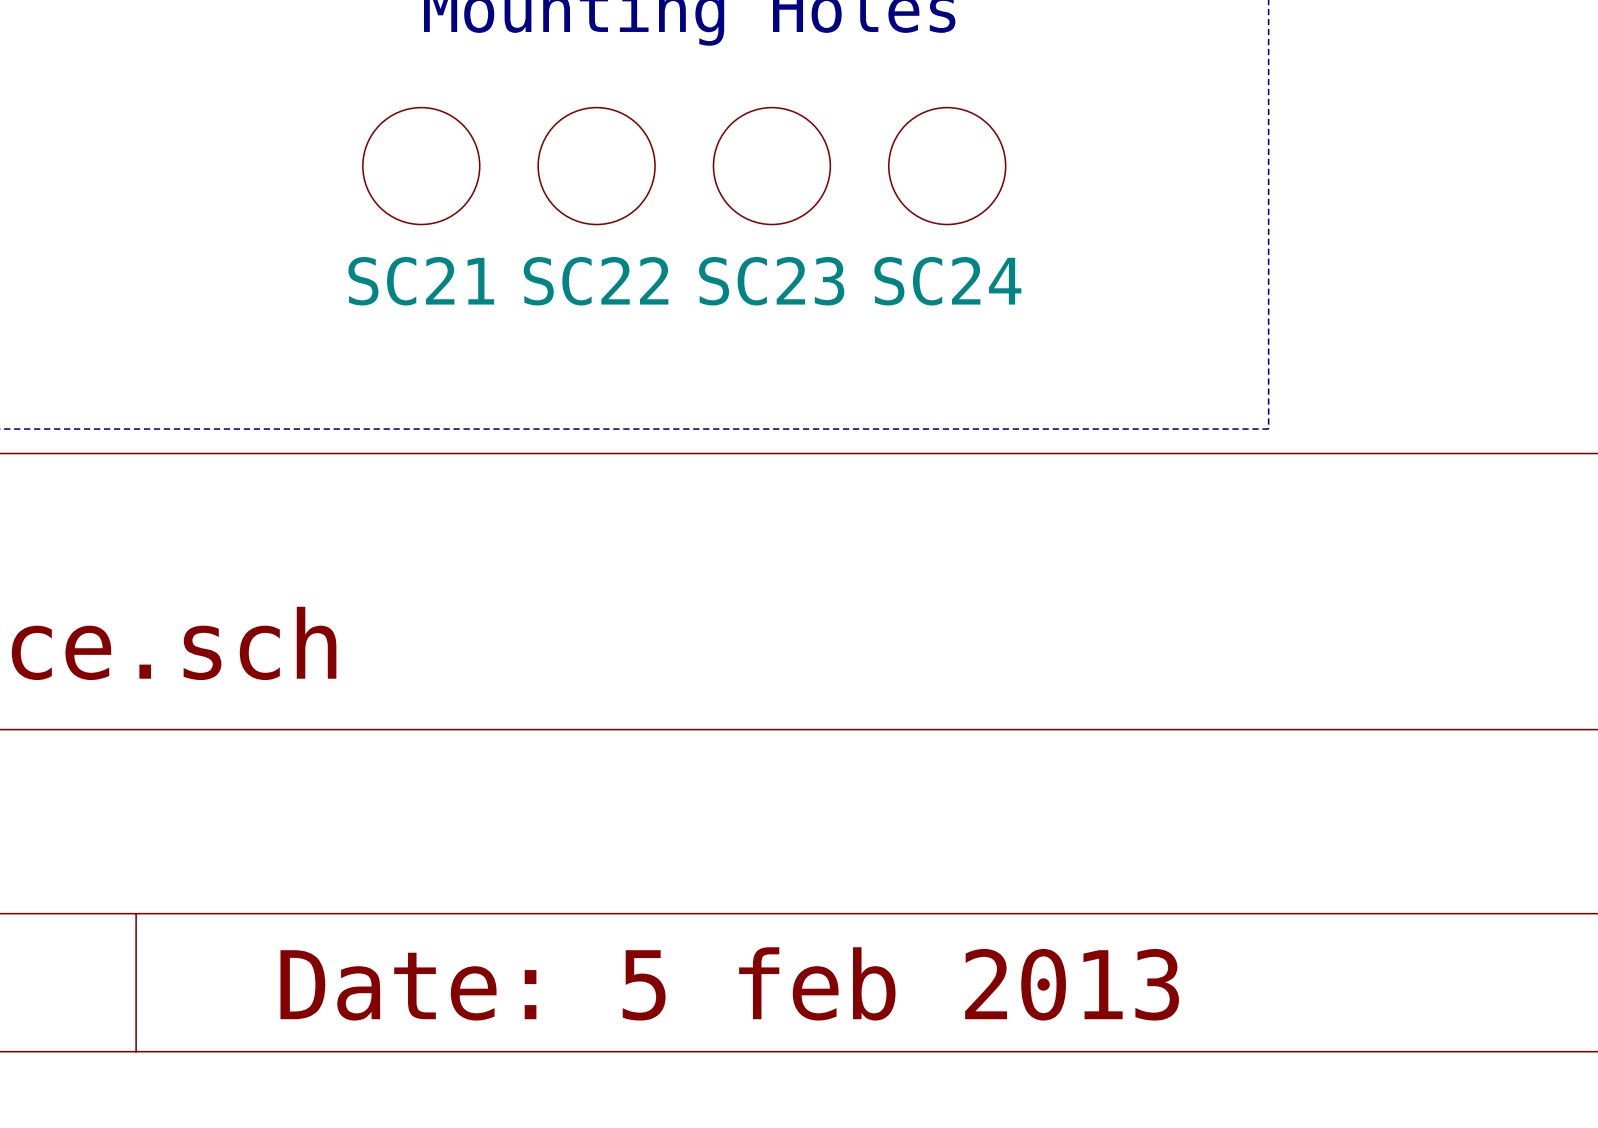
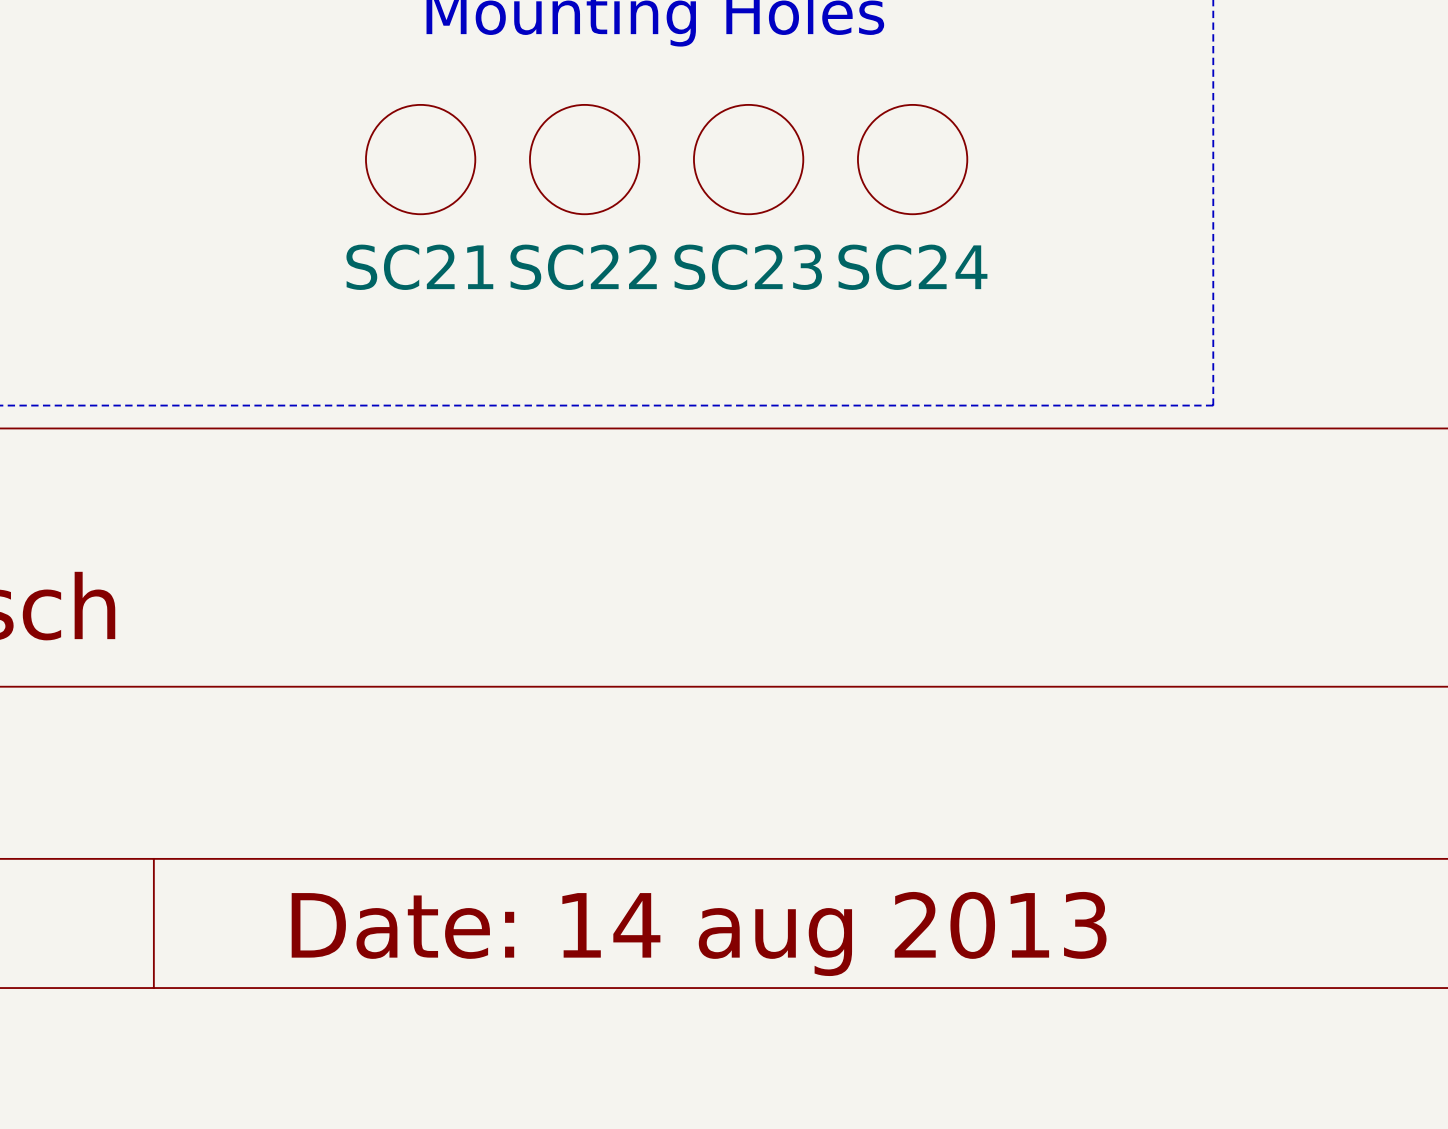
title block: Date: 5 feb 2013 (729, 983) -> Date: 14 aug 2013 (699, 933)

